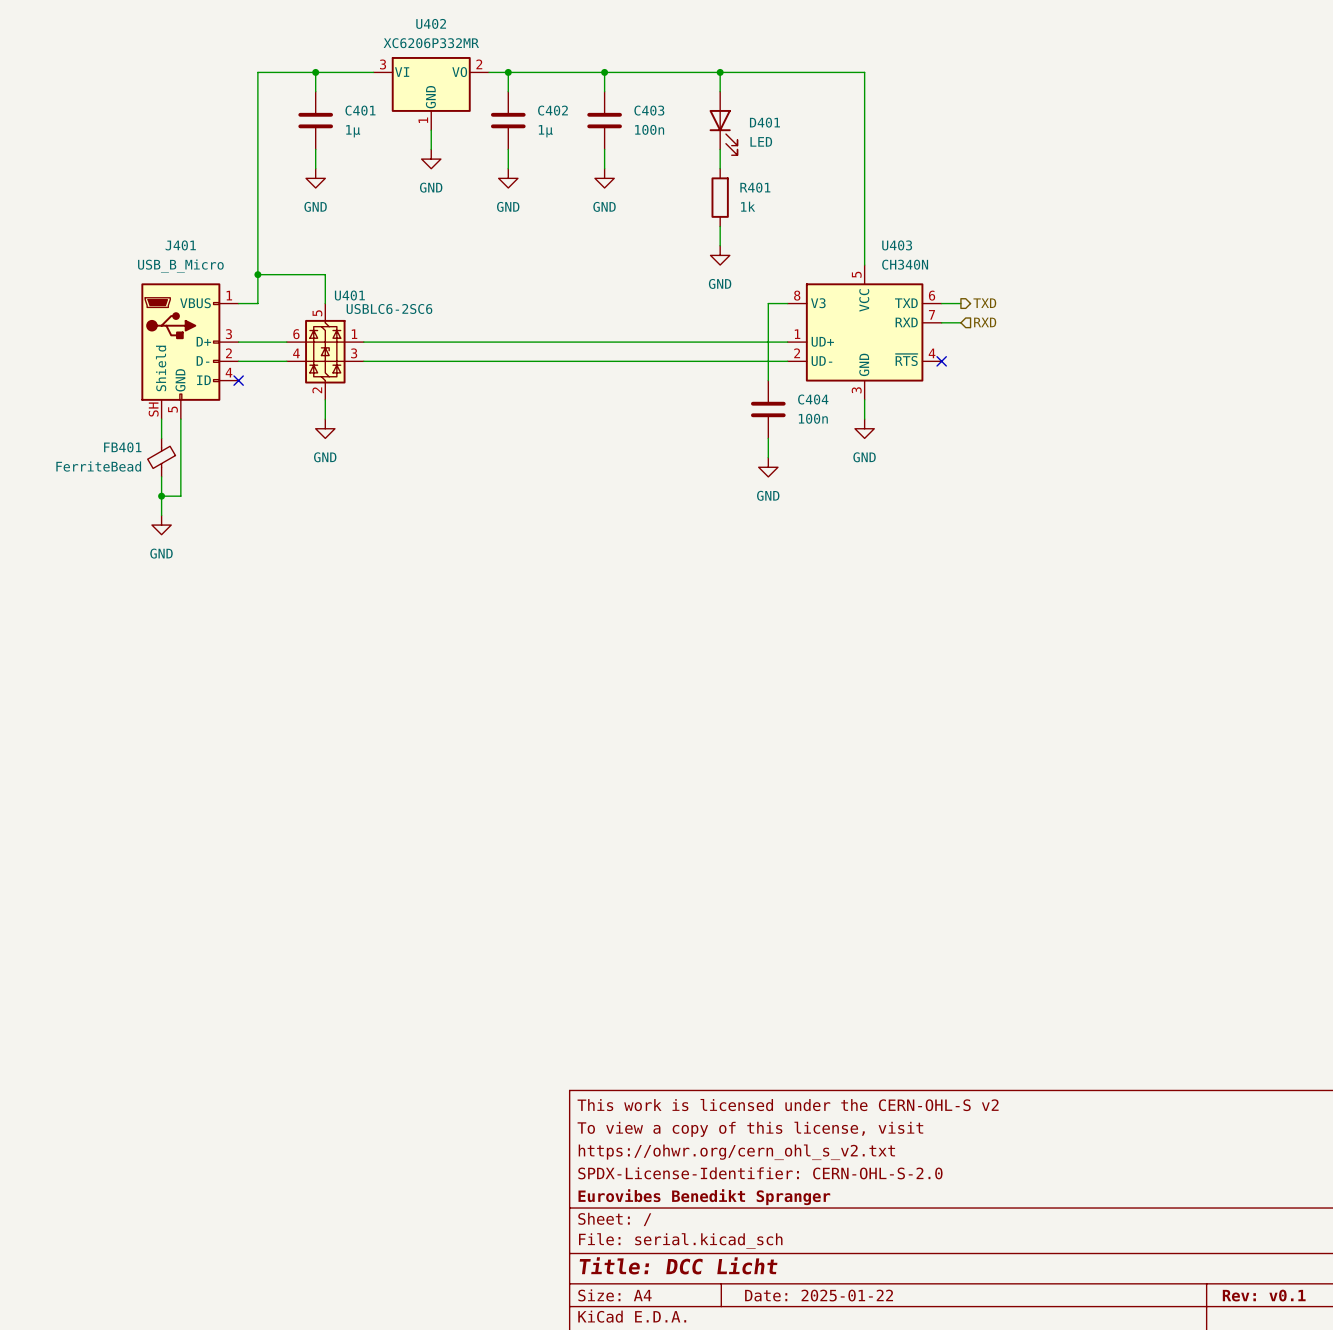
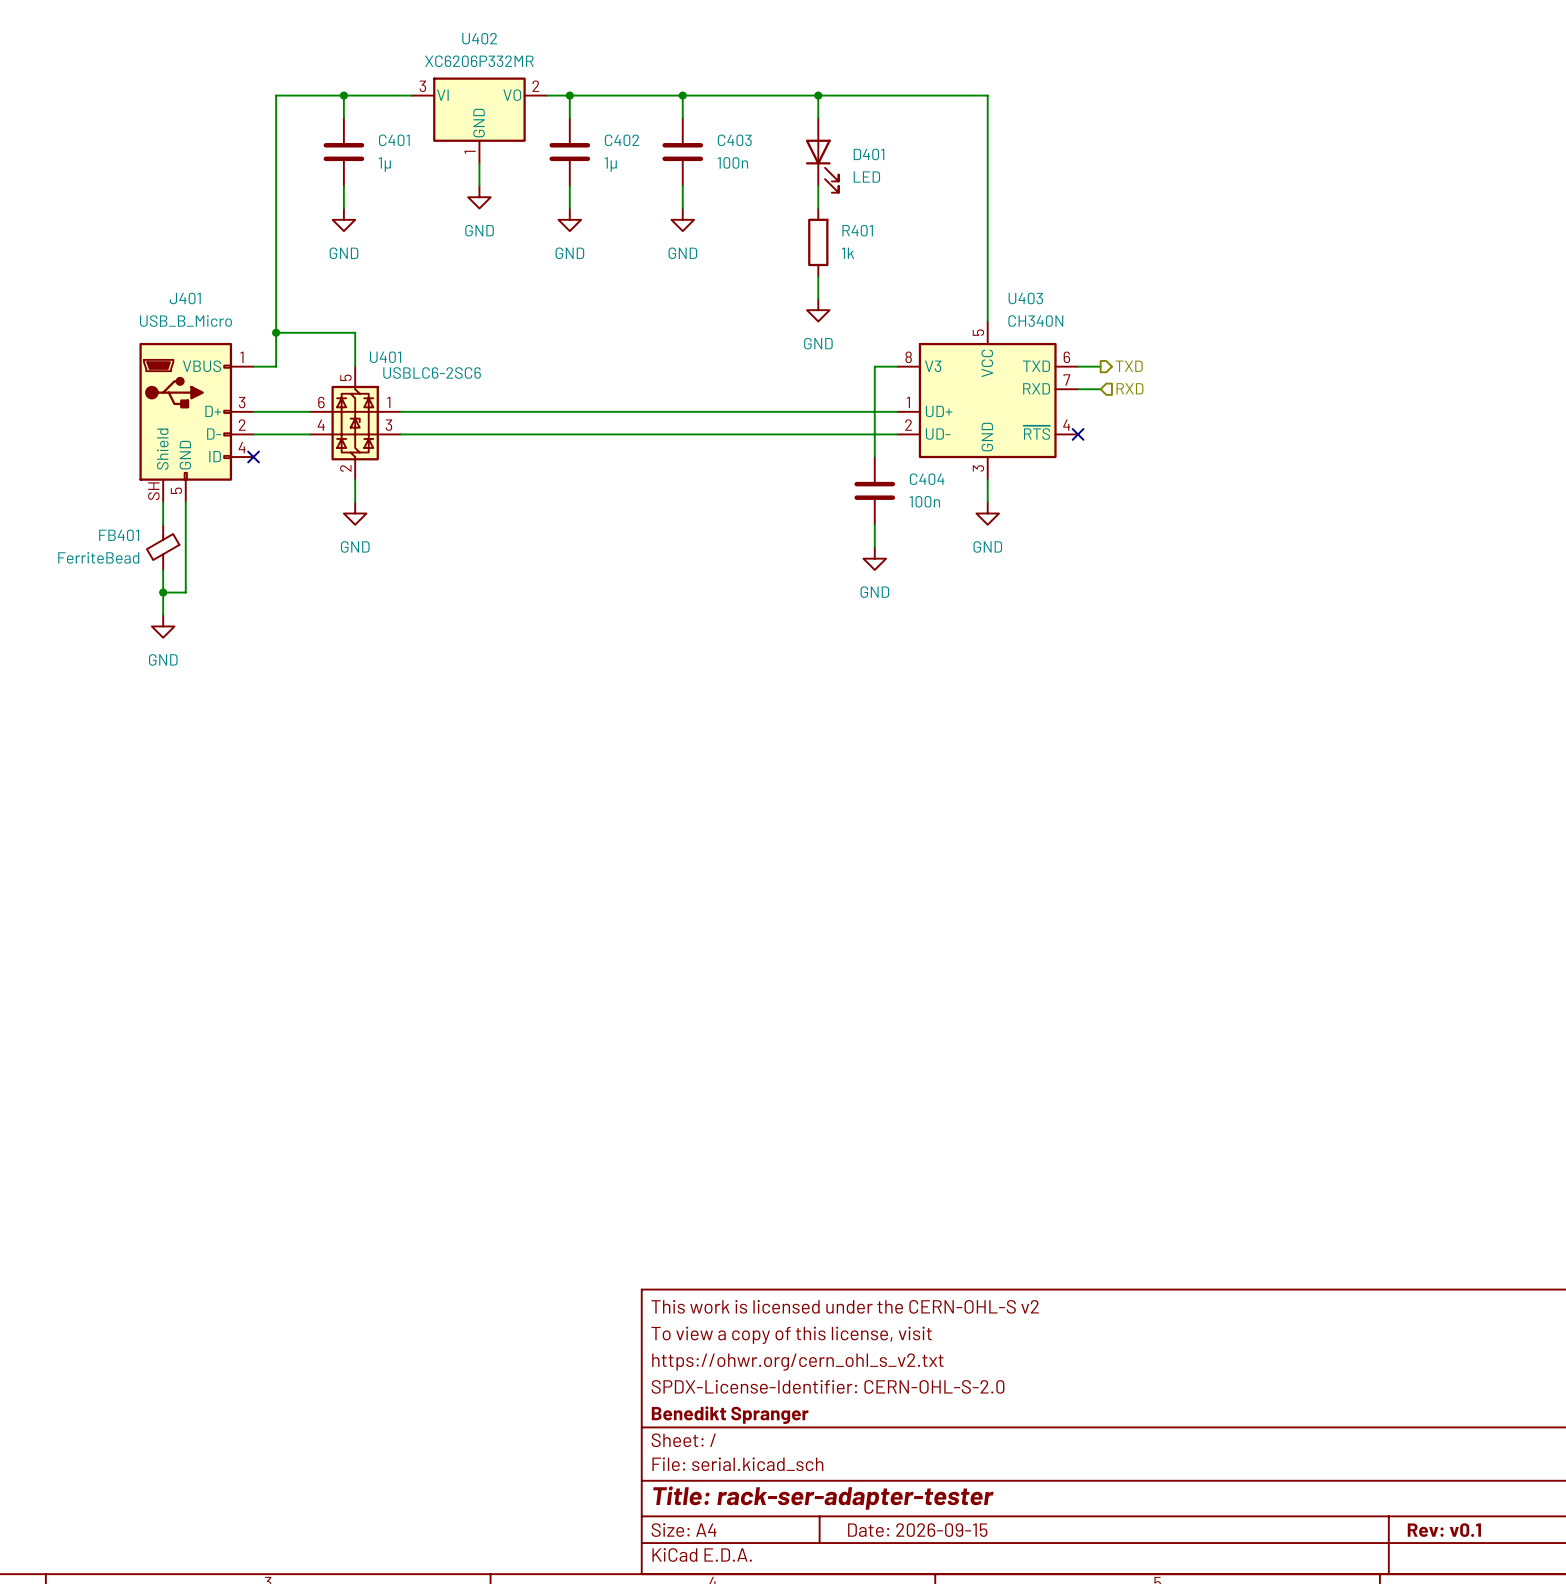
title block: Eurovibes Benedikt Spranger (704, 1197) -> Benedikt Spranger (730, 1415)
title block: Title: DCC Licht (678, 1265) -> Title: rack-ser-adapter-tester (823, 1498)
title block: Date: 2025-01-22 (819, 1295) -> Date: 2026-09-15 (917, 1530)

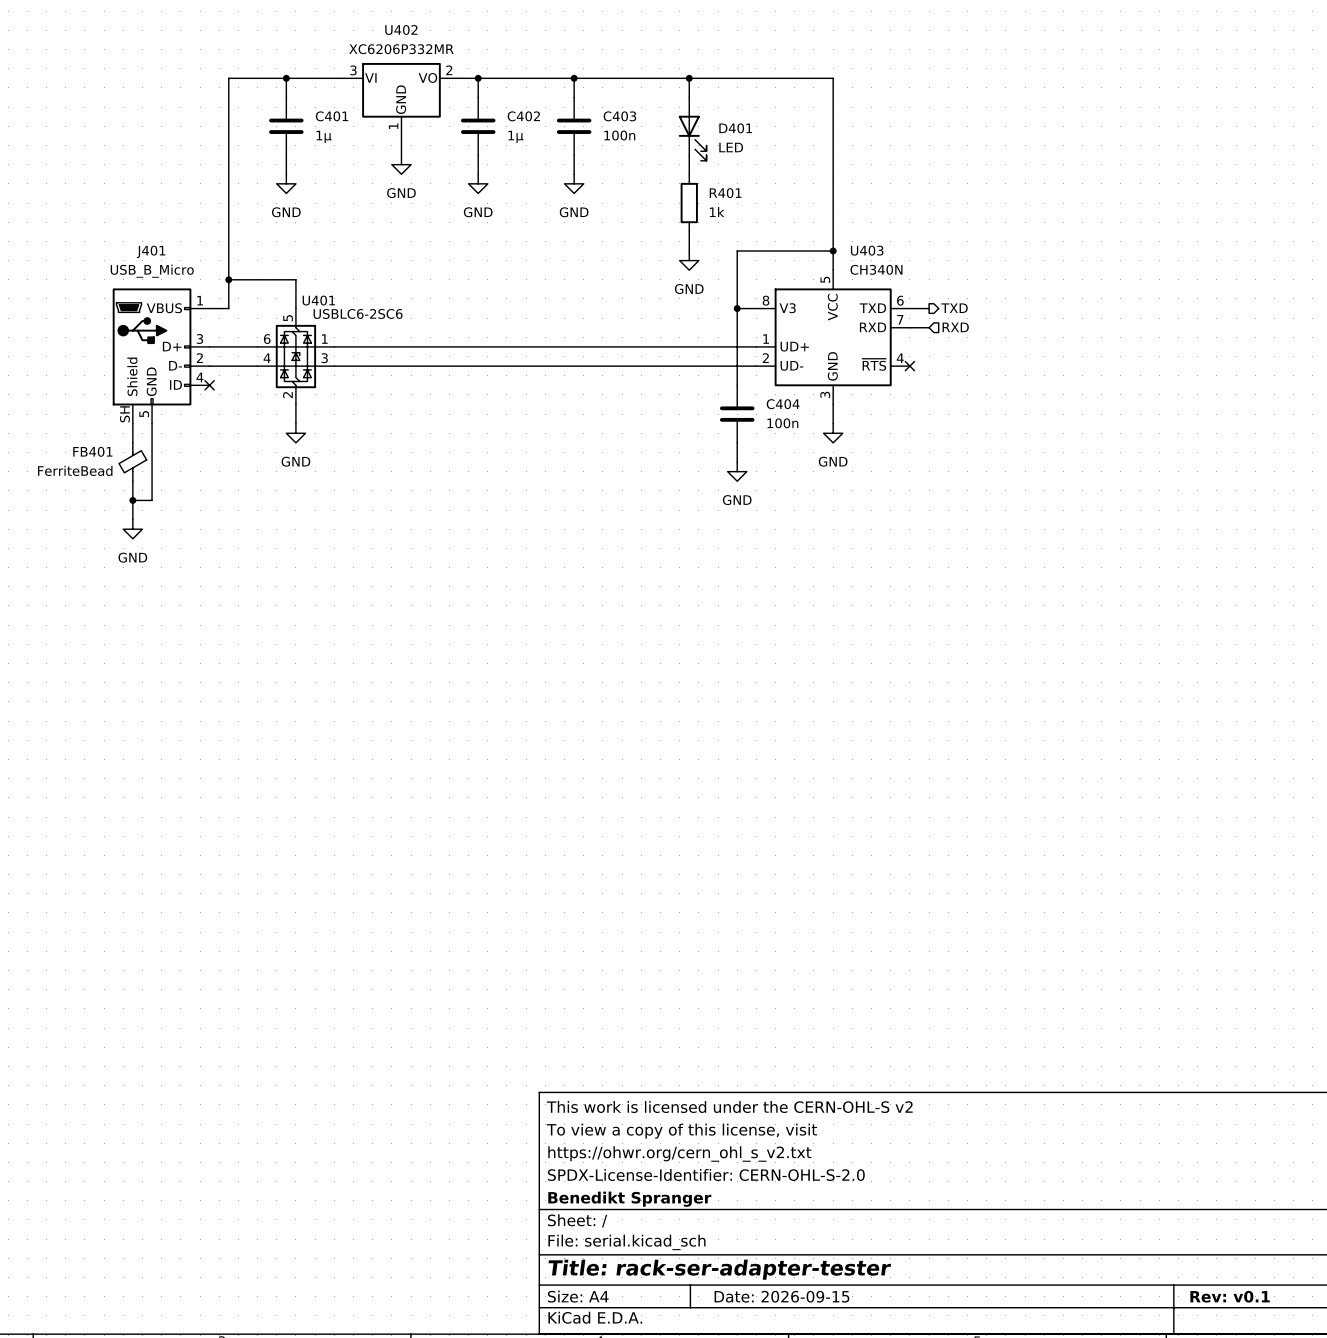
wire: none -> (833, 251) (737, 251) (737, 308)
junction: none -> (833, 251)
junction: none -> (737, 308)

